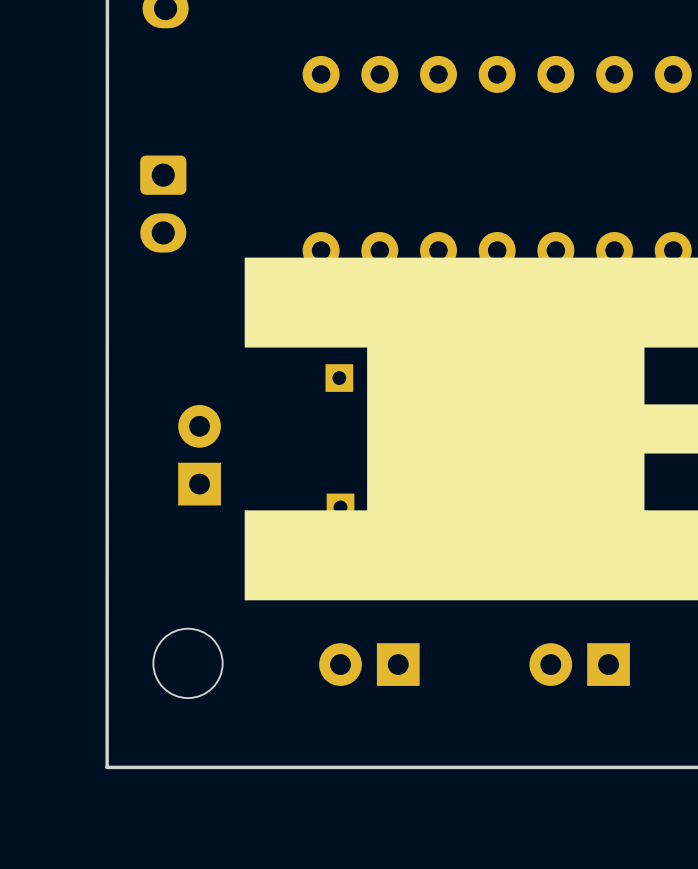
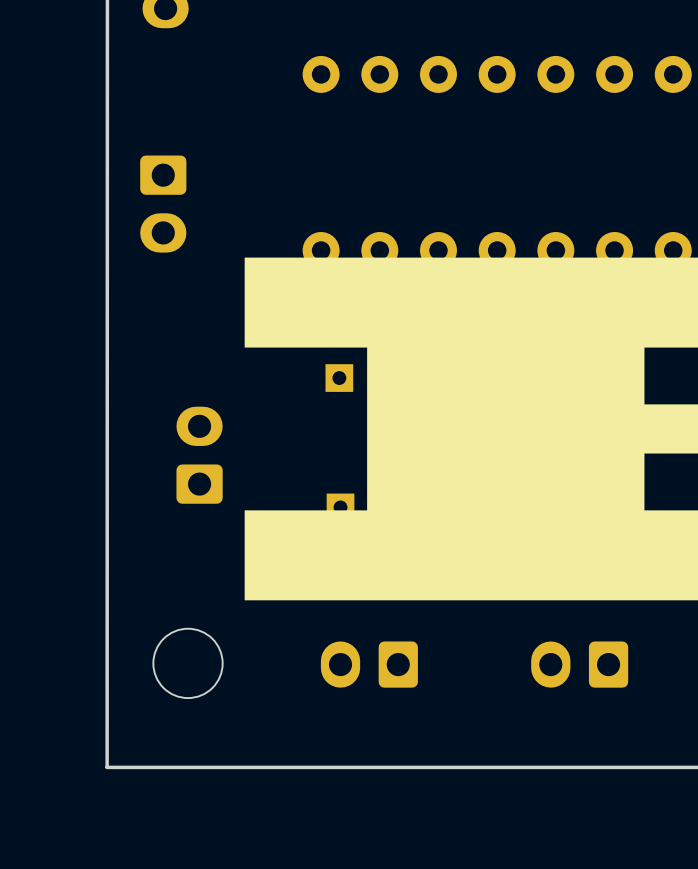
part footprint: [178, 404, 221, 506] -> [176, 406, 223, 504]
part footprint: [319, 643, 420, 686] -> [320, 641, 418, 688]
part footprint: [529, 643, 630, 686] -> [531, 641, 629, 688]

